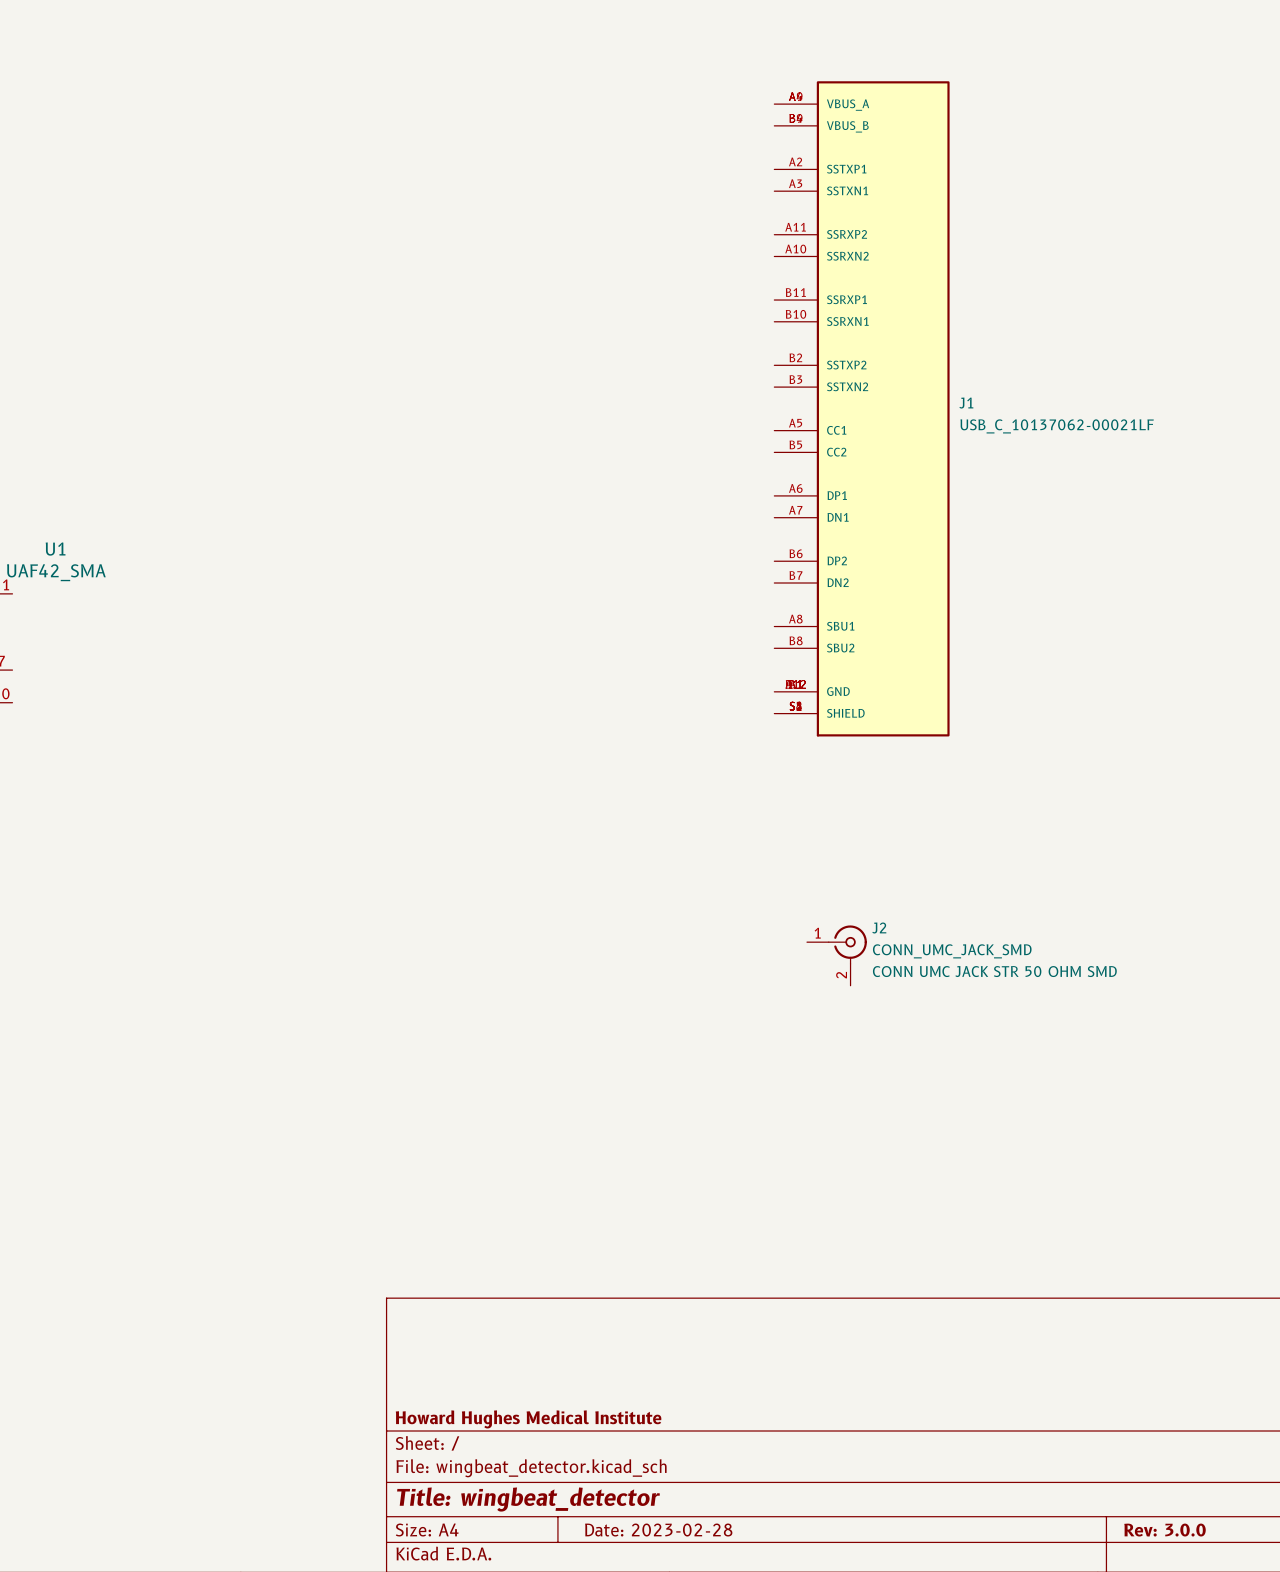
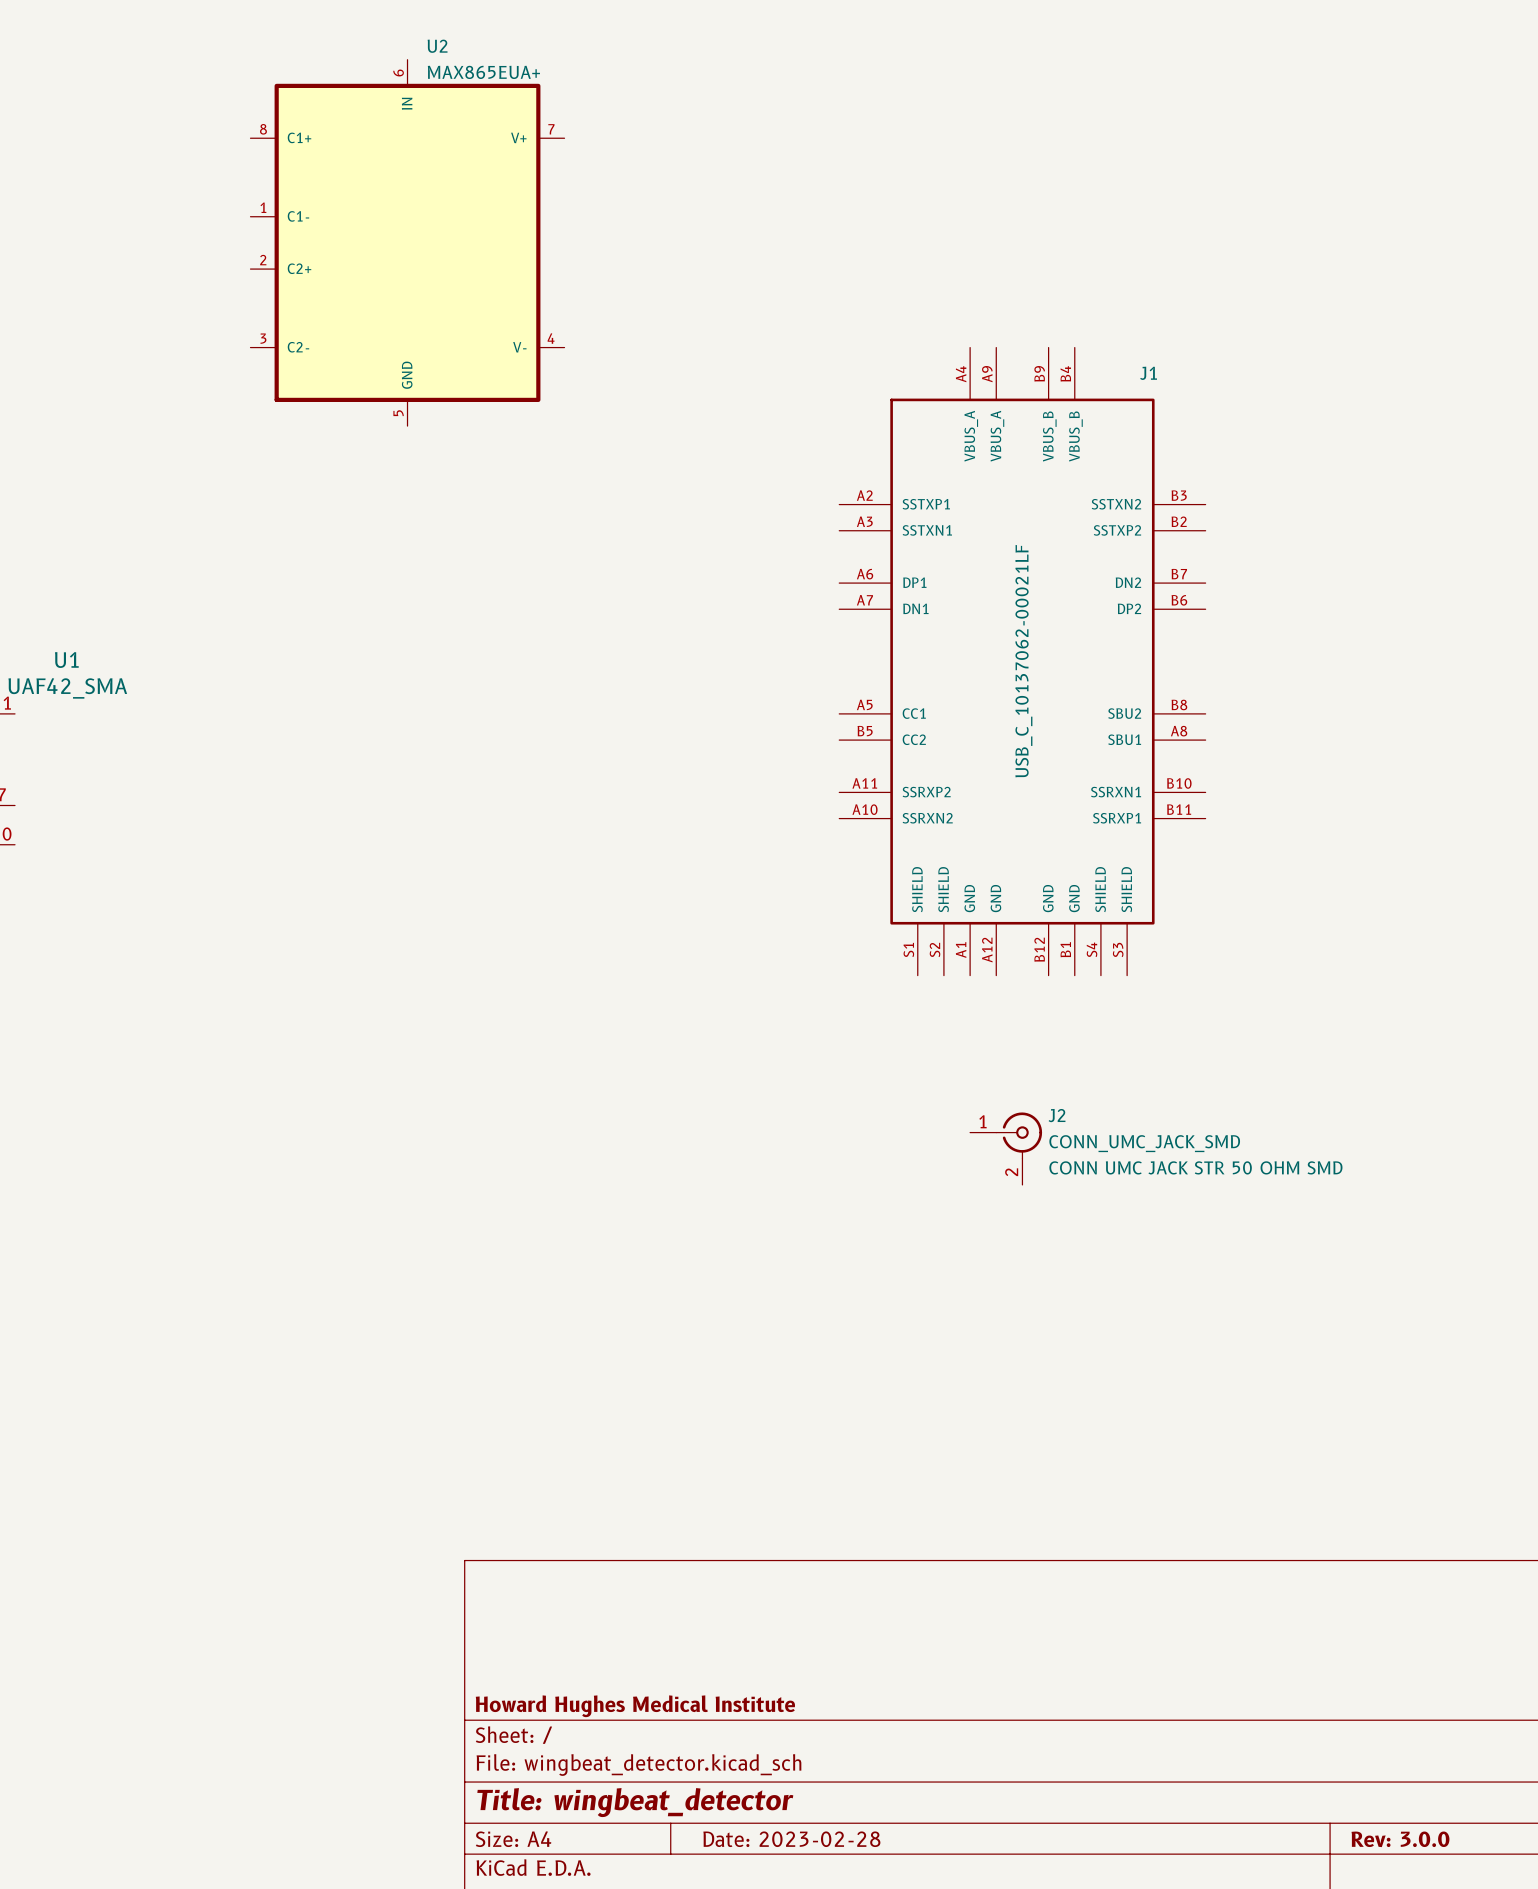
J1 symbol: [774, 81, 950, 737] -> [839, 347, 1206, 976]
U2: none -> MAX865EUA+ (407, 242)
J1 name position: J1 (966, 403) -> J1 (1148, 373)
J1 value position: USB_C_10137062-00021LF (1057, 426) -> USB_C_10137062-00021LF (1023, 661)

